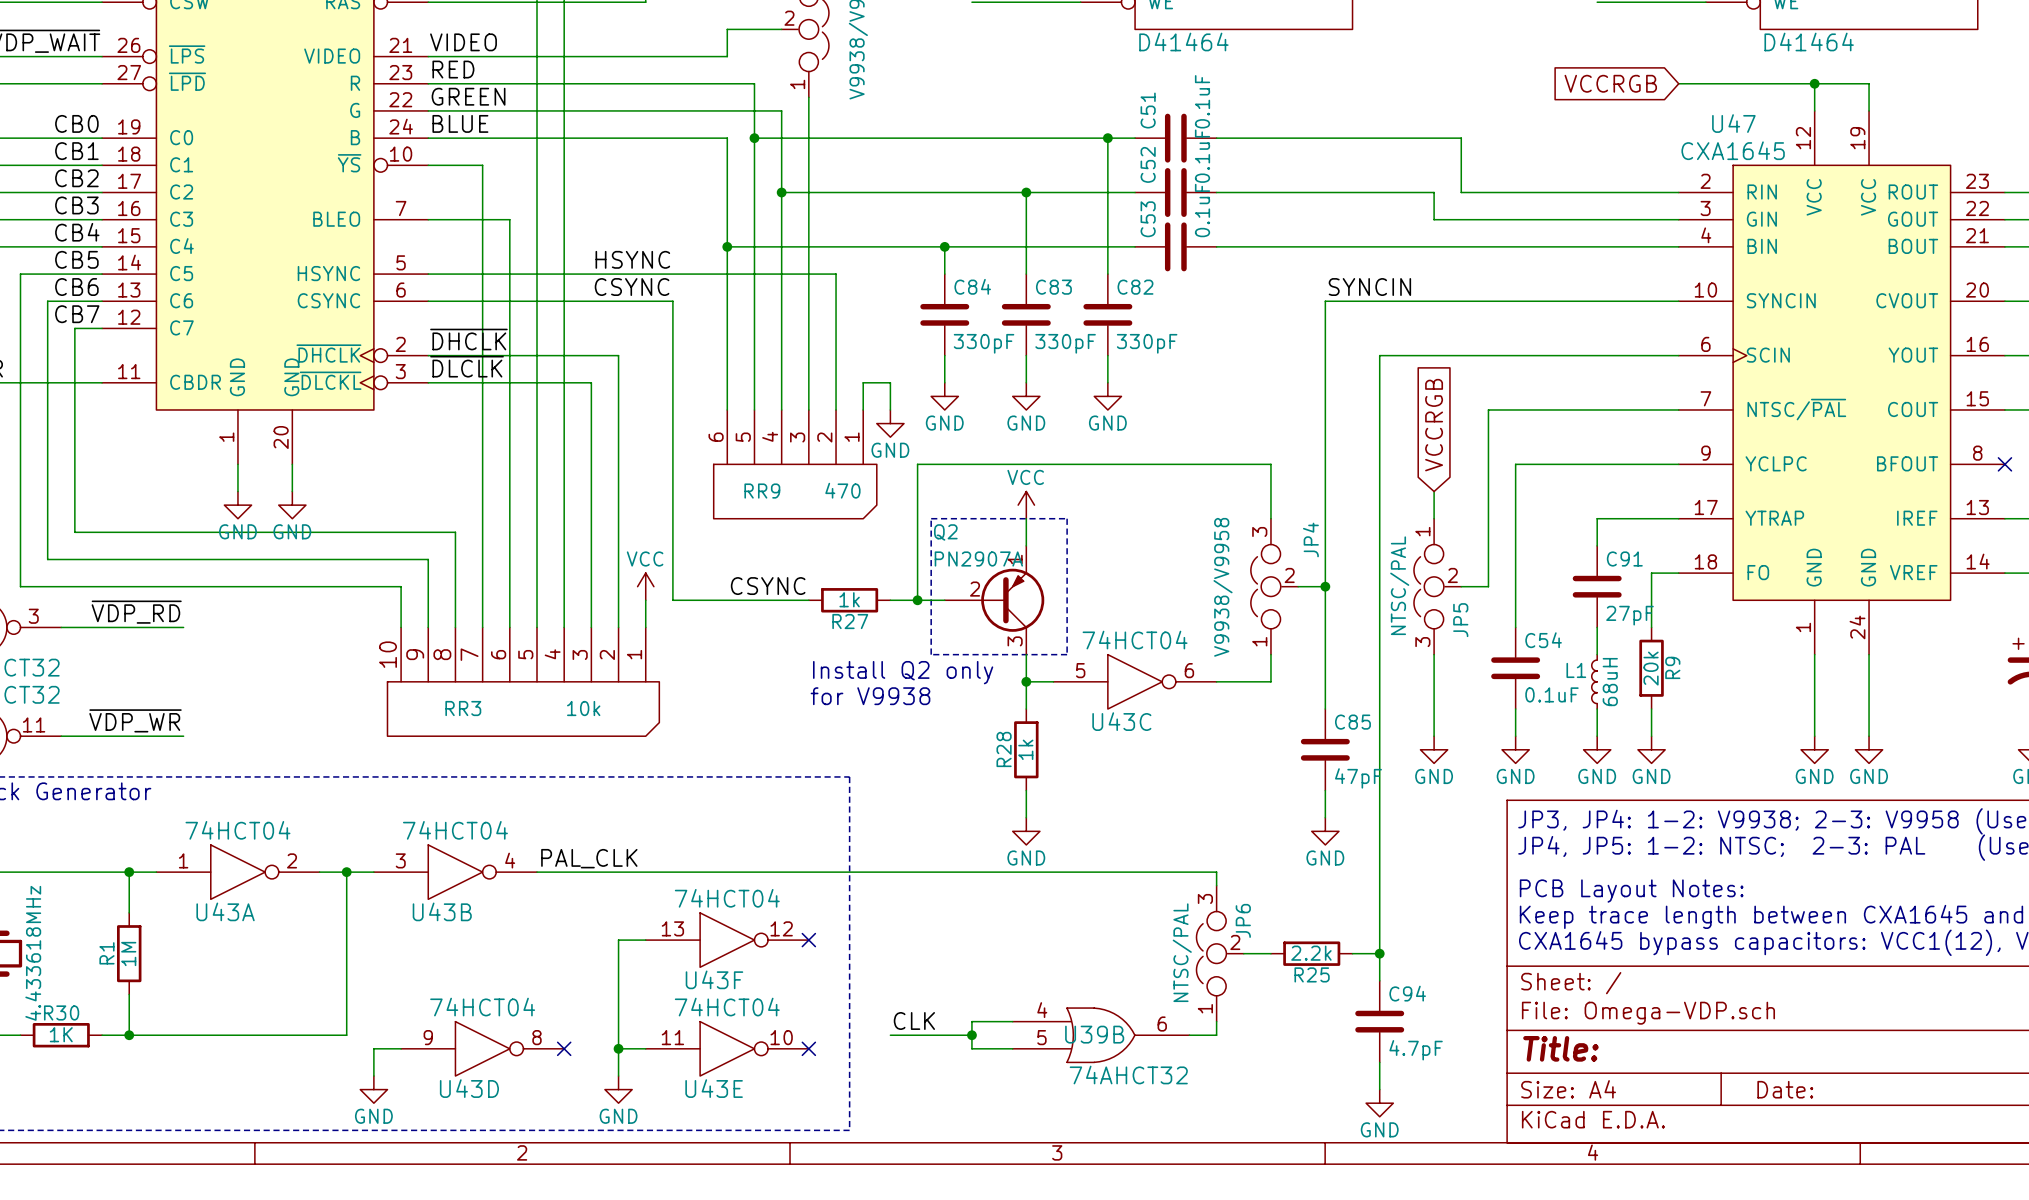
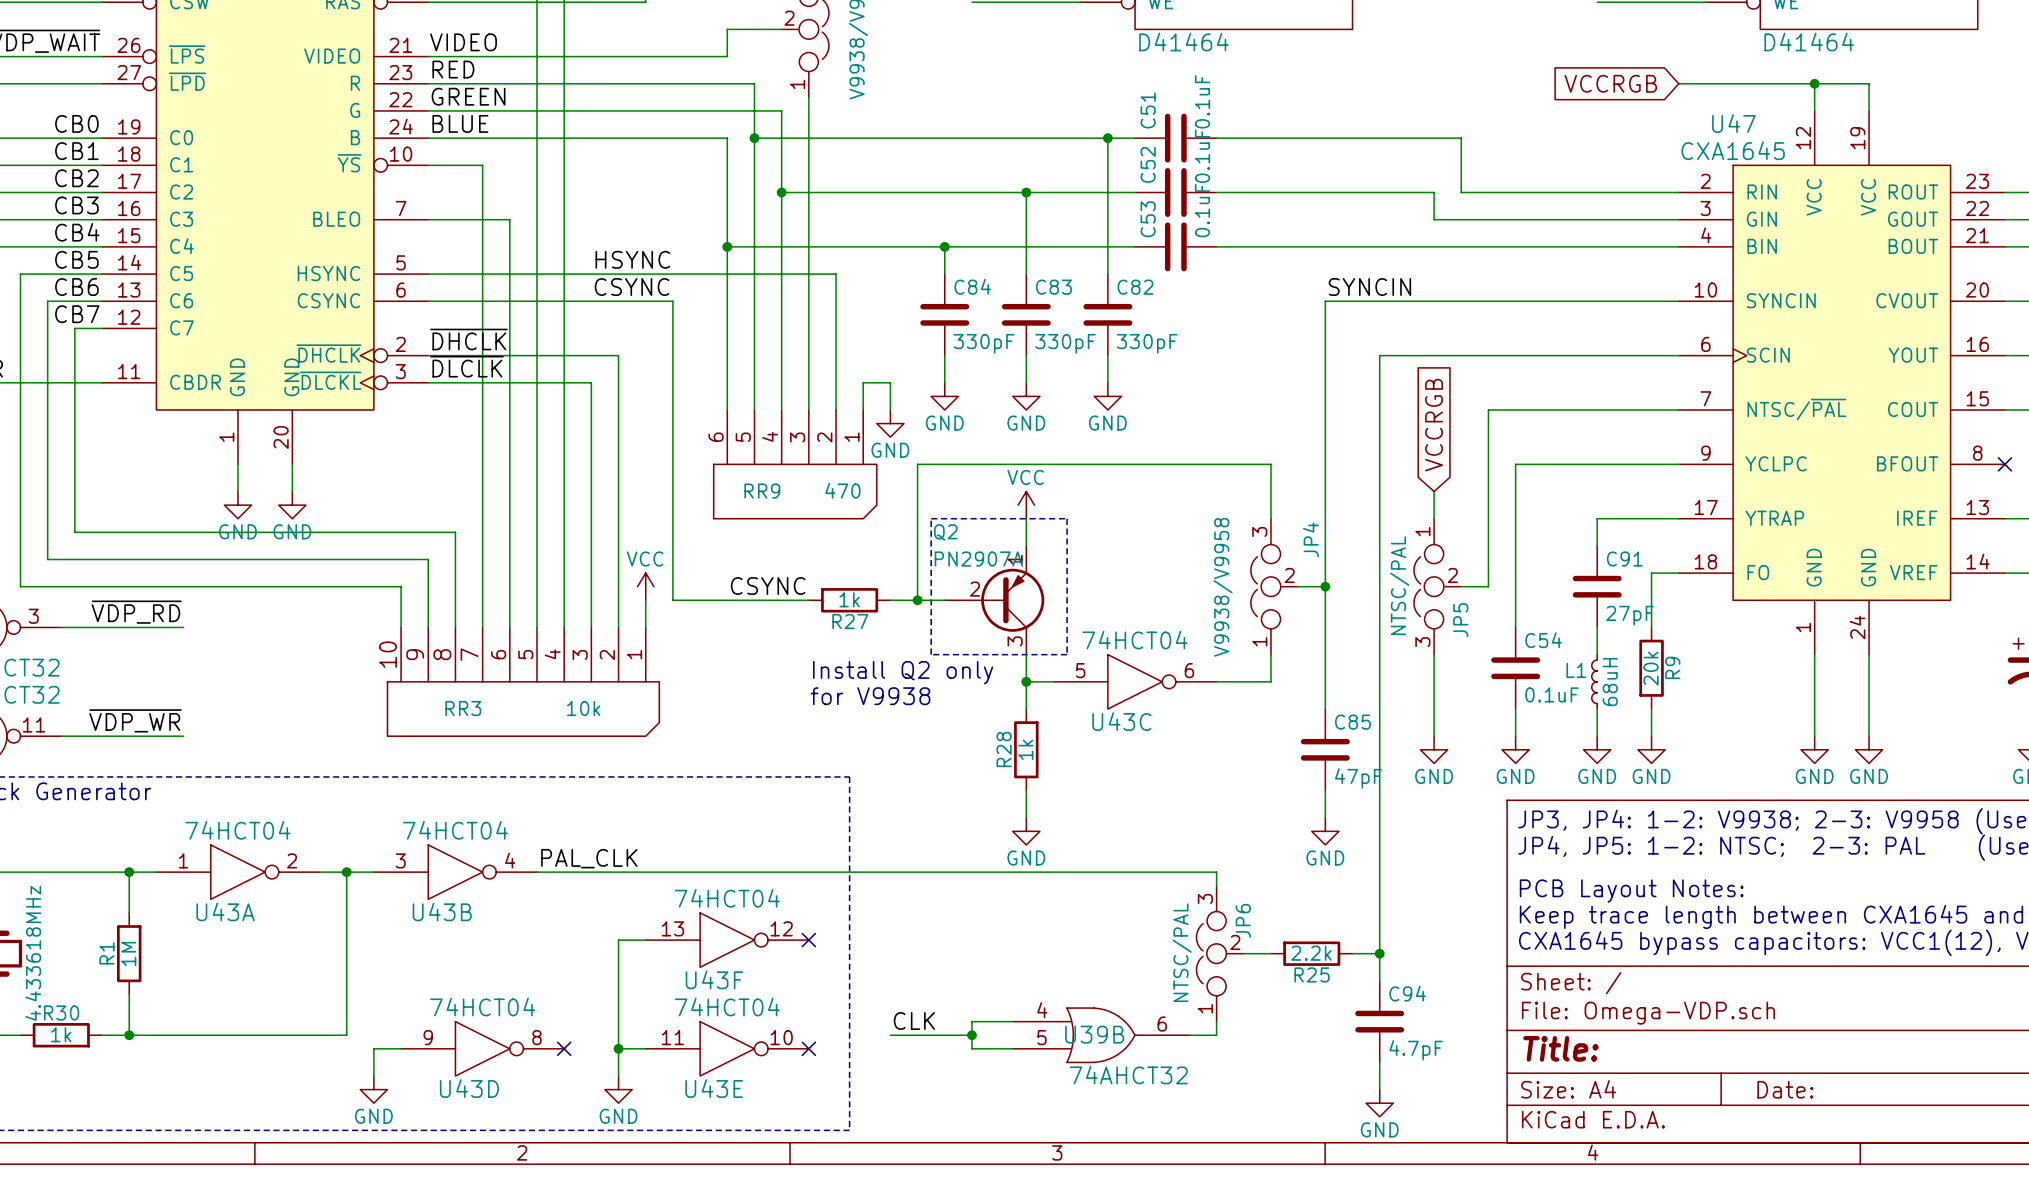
R30 value: 1K (61, 1034) -> 1k (61, 1034)

